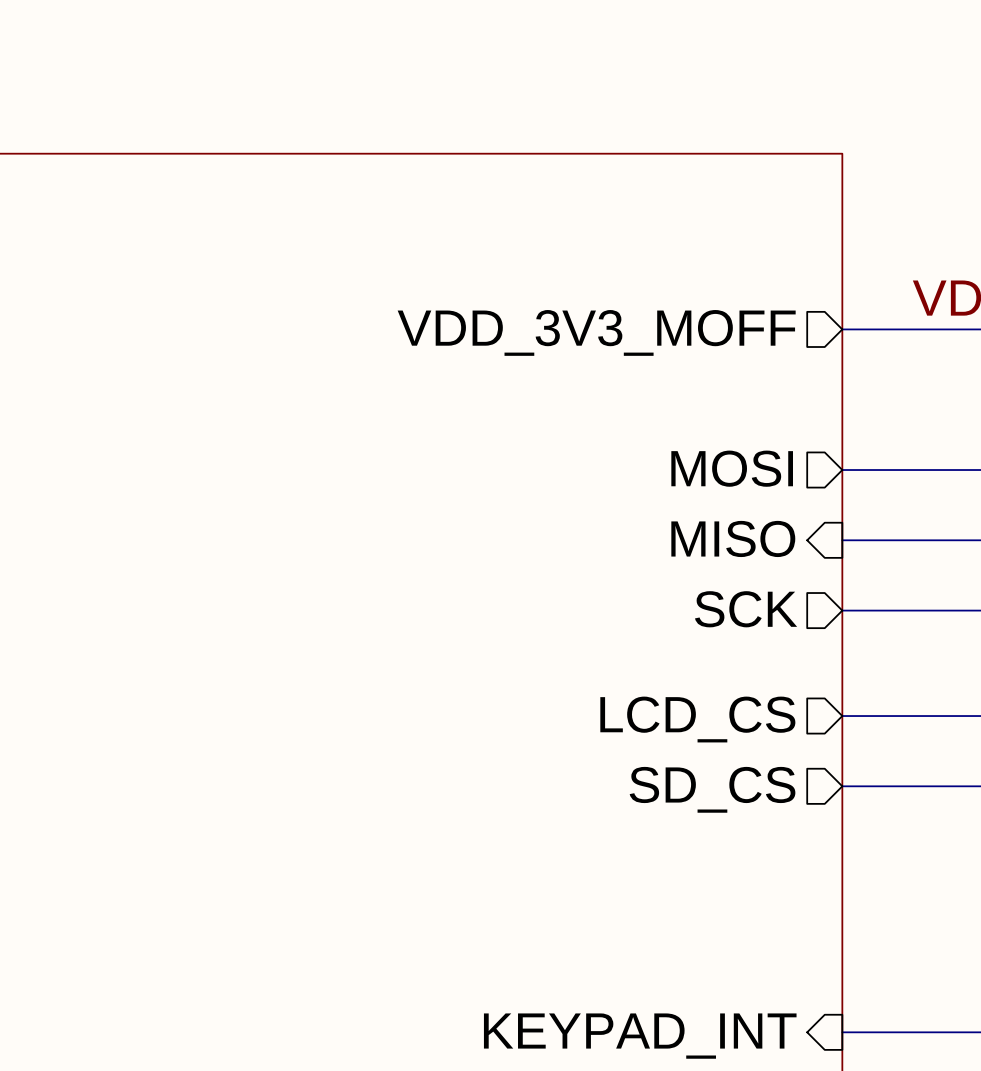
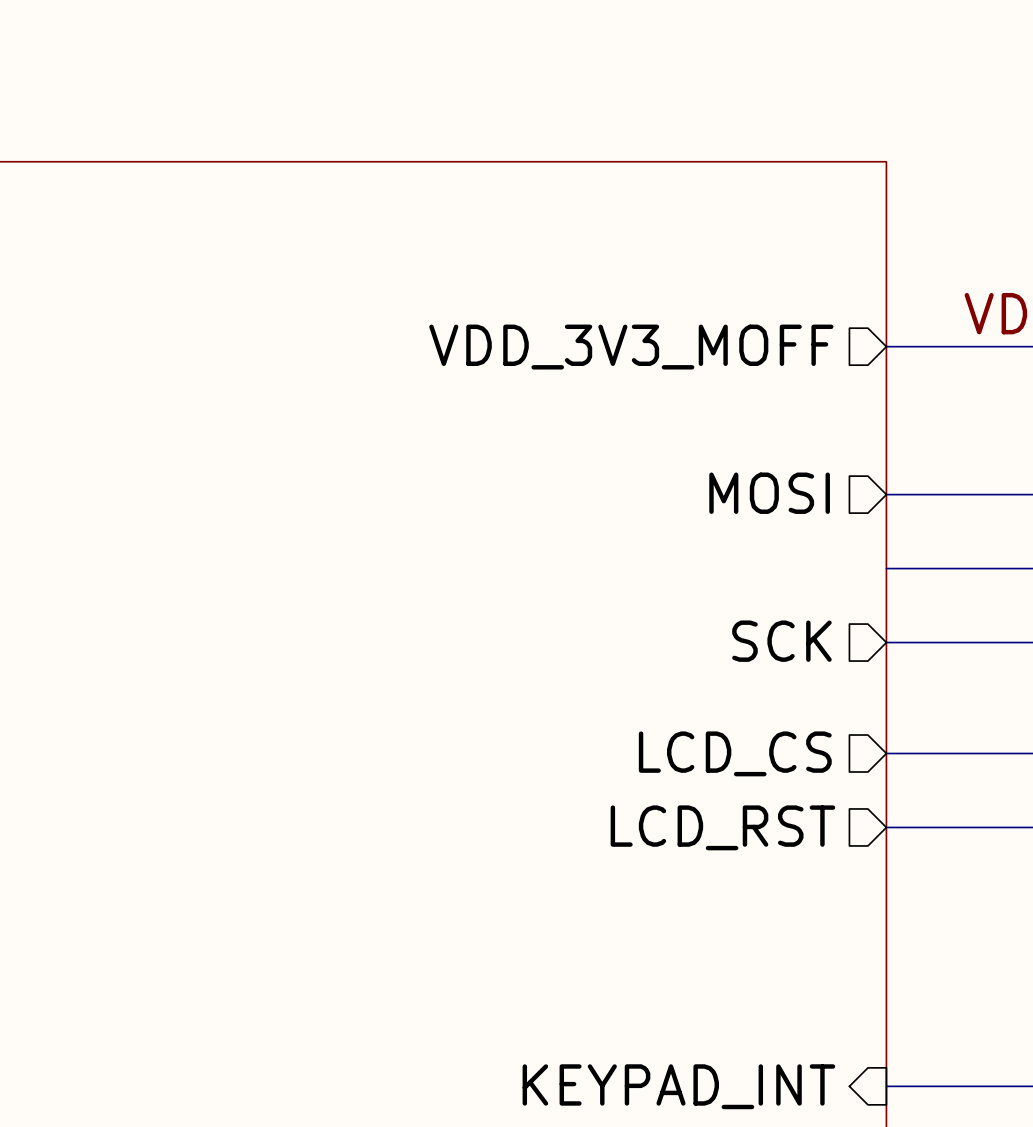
sheet pin: MISO (733, 538) -> none
sheet pin: SD_CS (712, 789) -> LCD_RST (722, 827)

